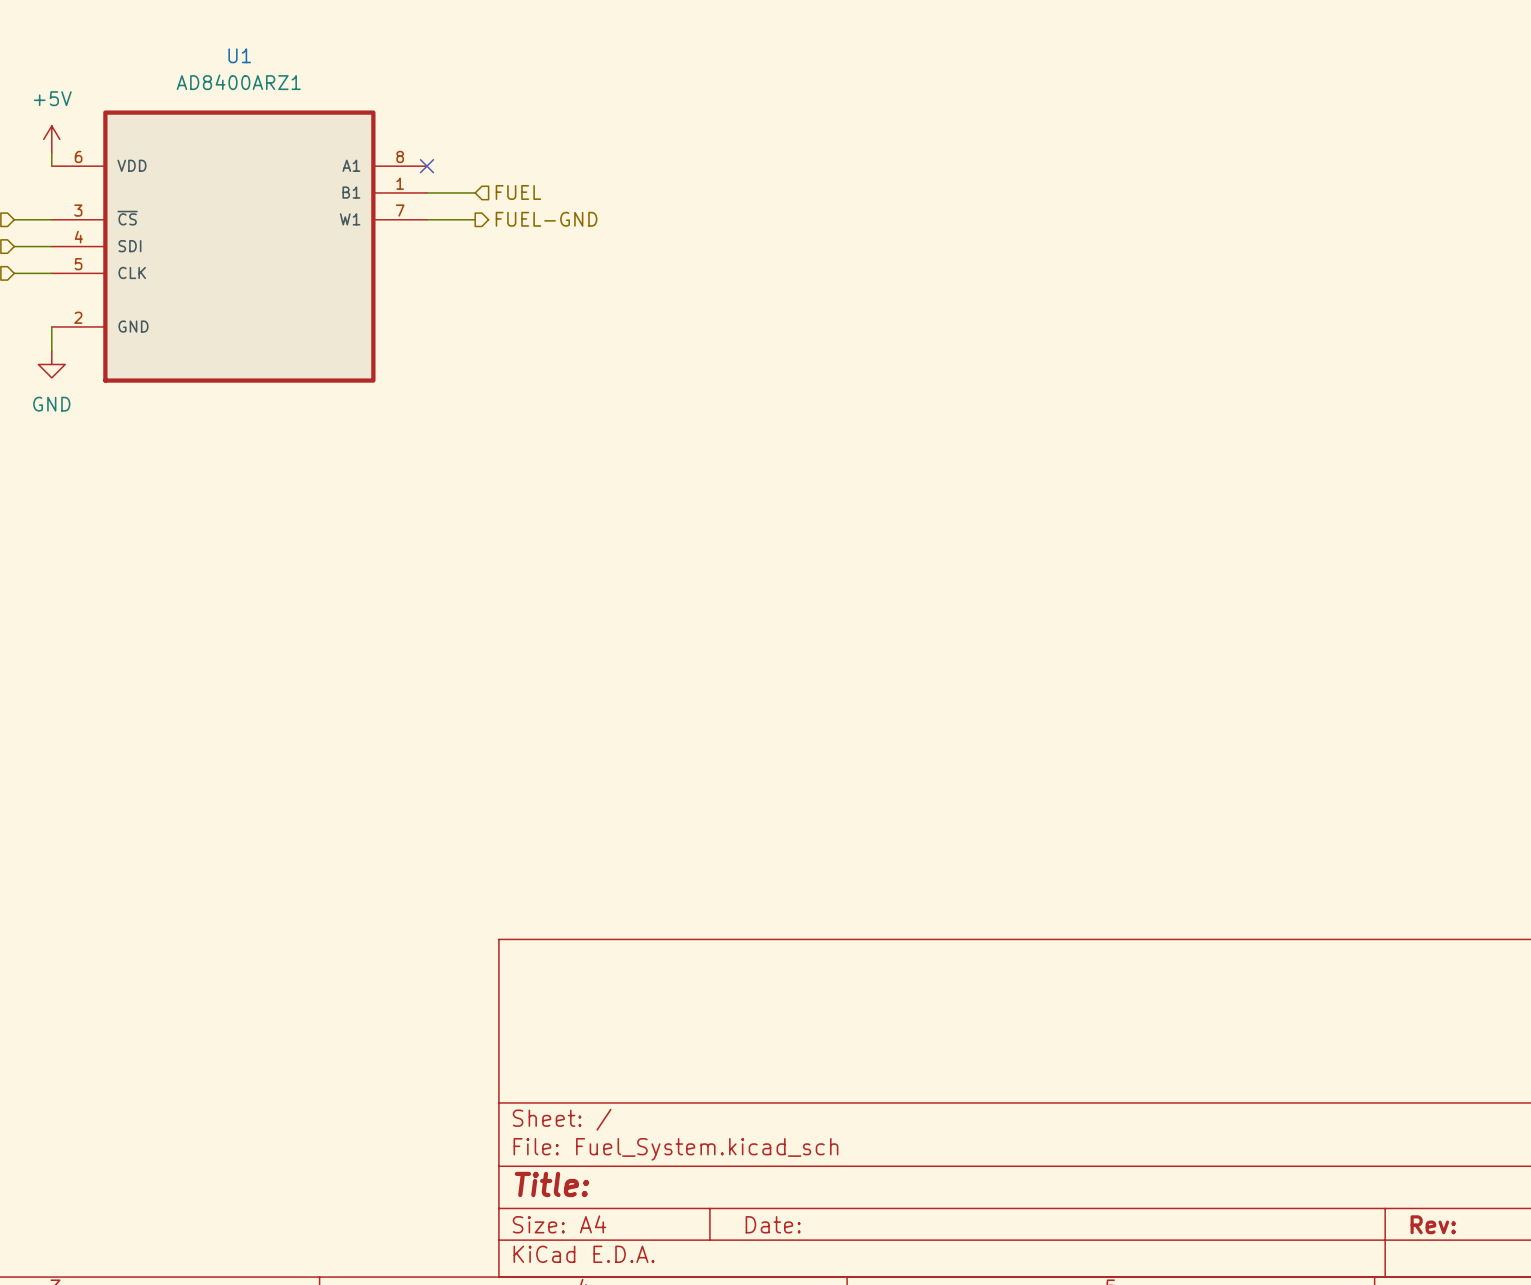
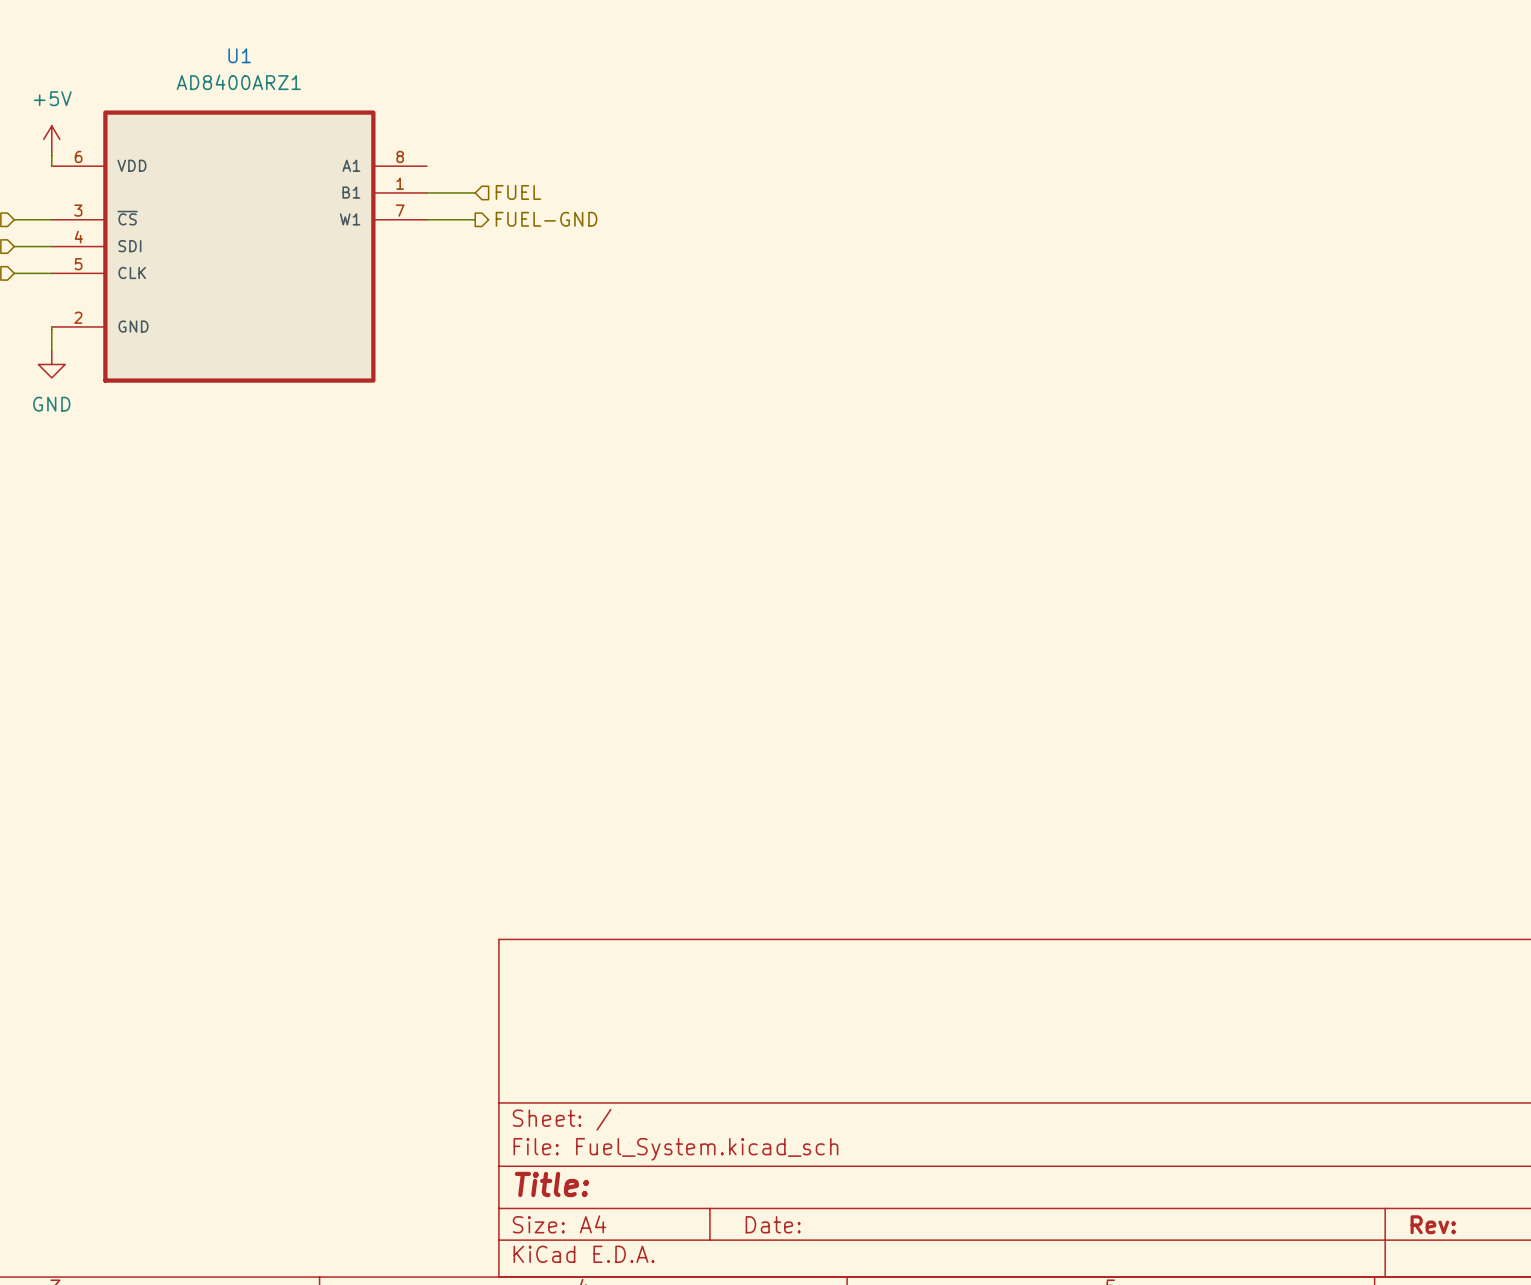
no-connect mark: (426, 166) -> none

